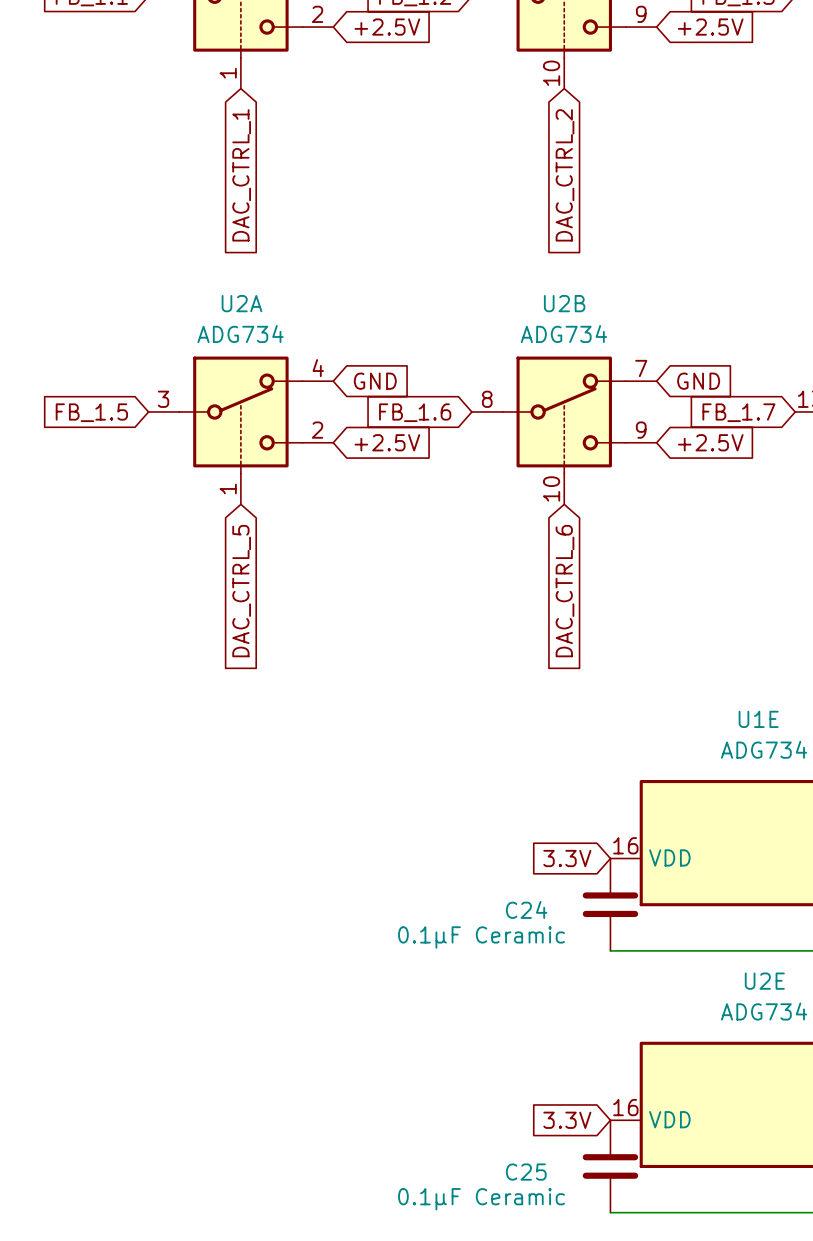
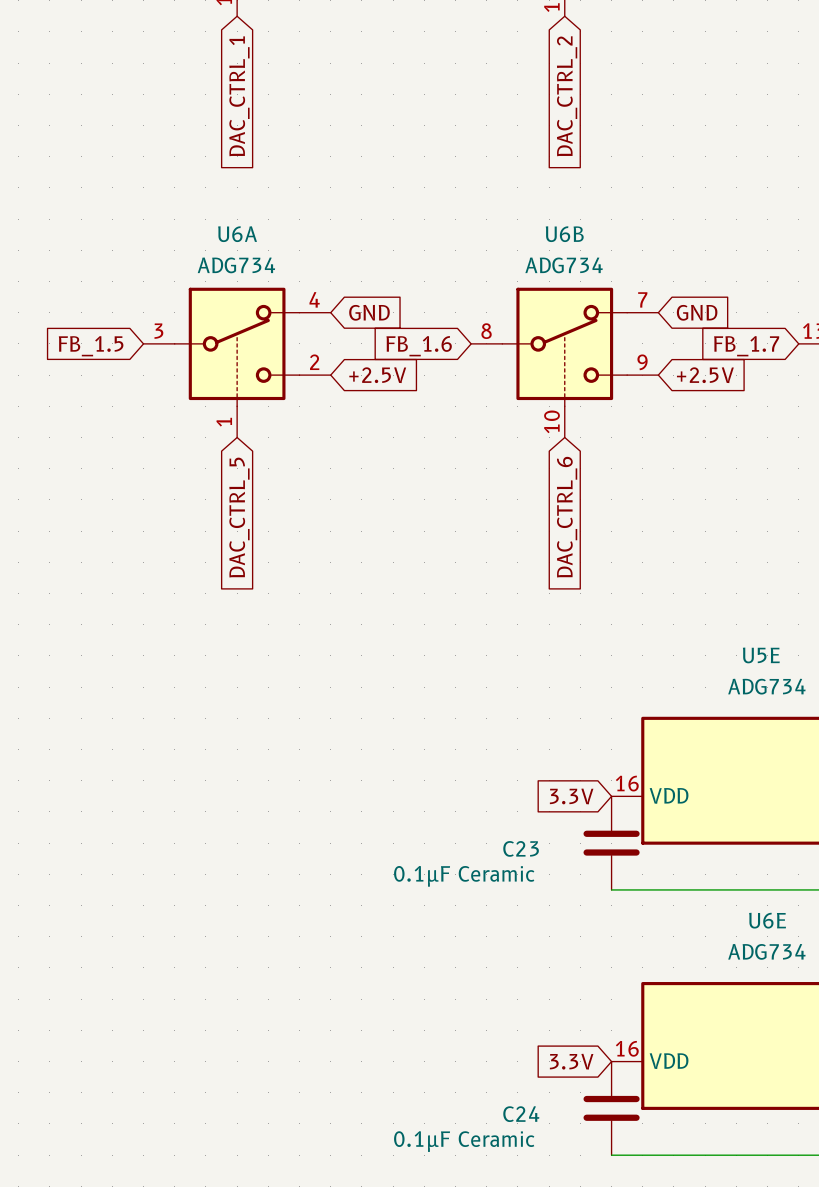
U2A name: U2A (242, 303) -> U6A (237, 234)
U2B name: U2B (564, 303) -> U6B (564, 234)
U1E name: U1E (758, 719) -> U5E (761, 655)
C24 name: C24 (526, 909) -> C23 (521, 848)
U2E name: U2E (764, 981) -> U6E (767, 920)
C25 name: C25 (526, 1172) -> C24 (521, 1114)

